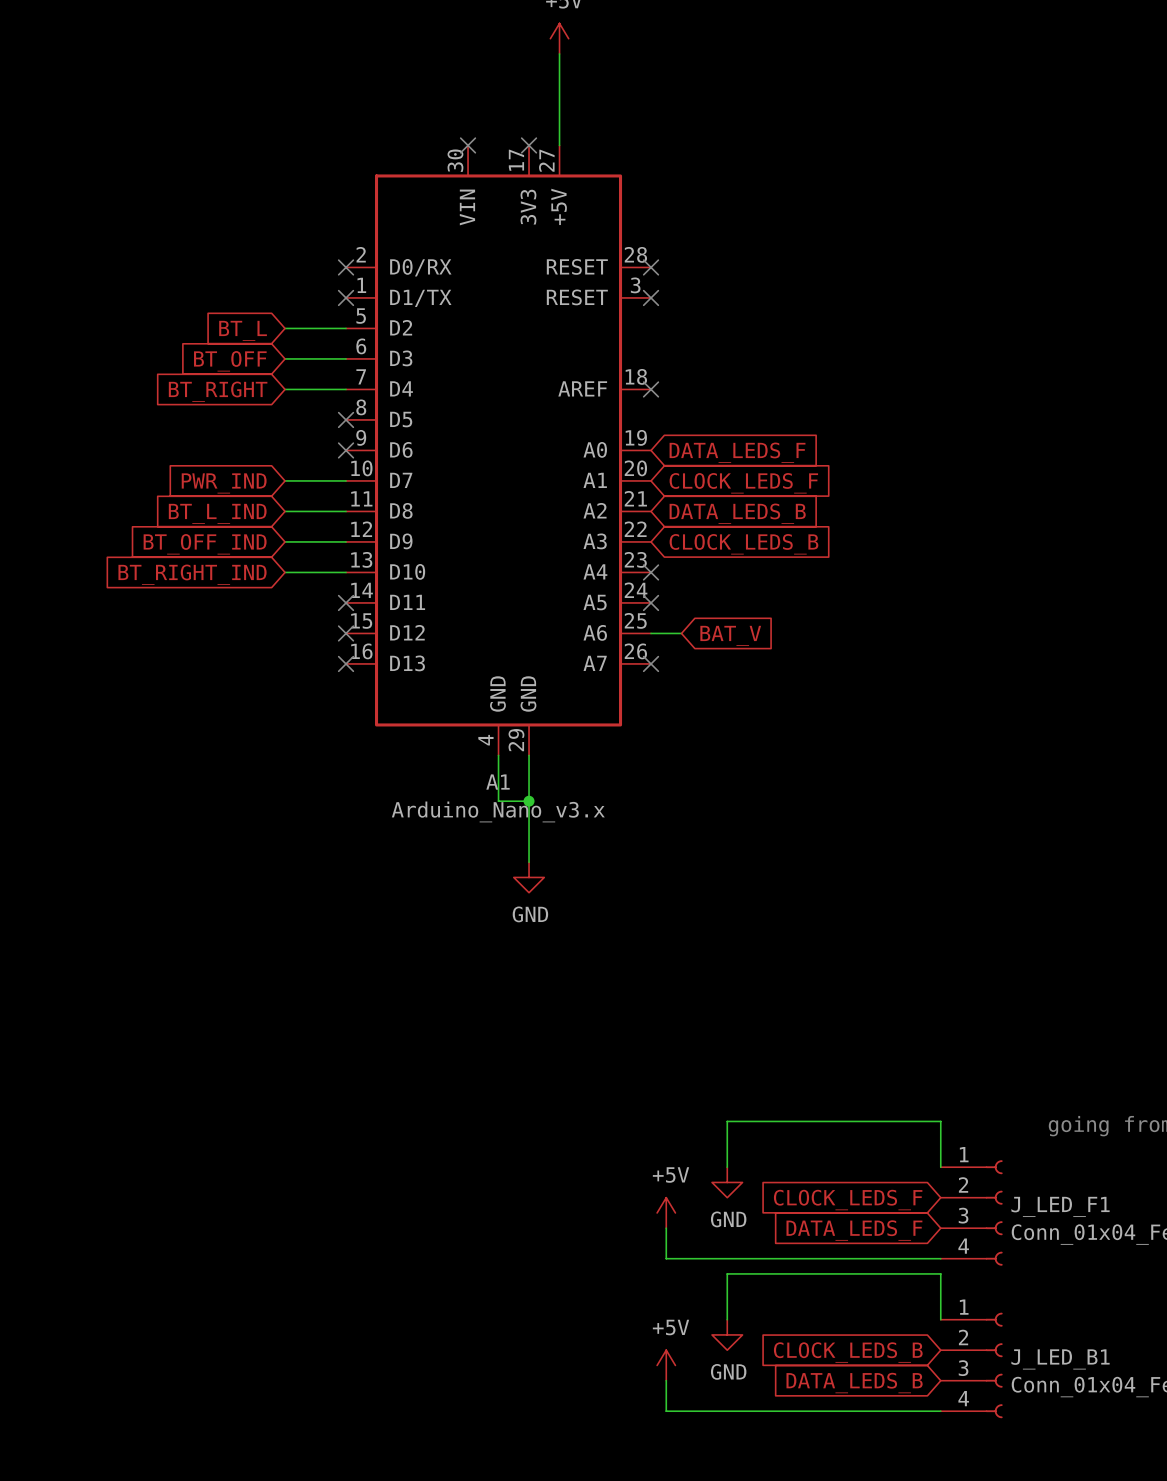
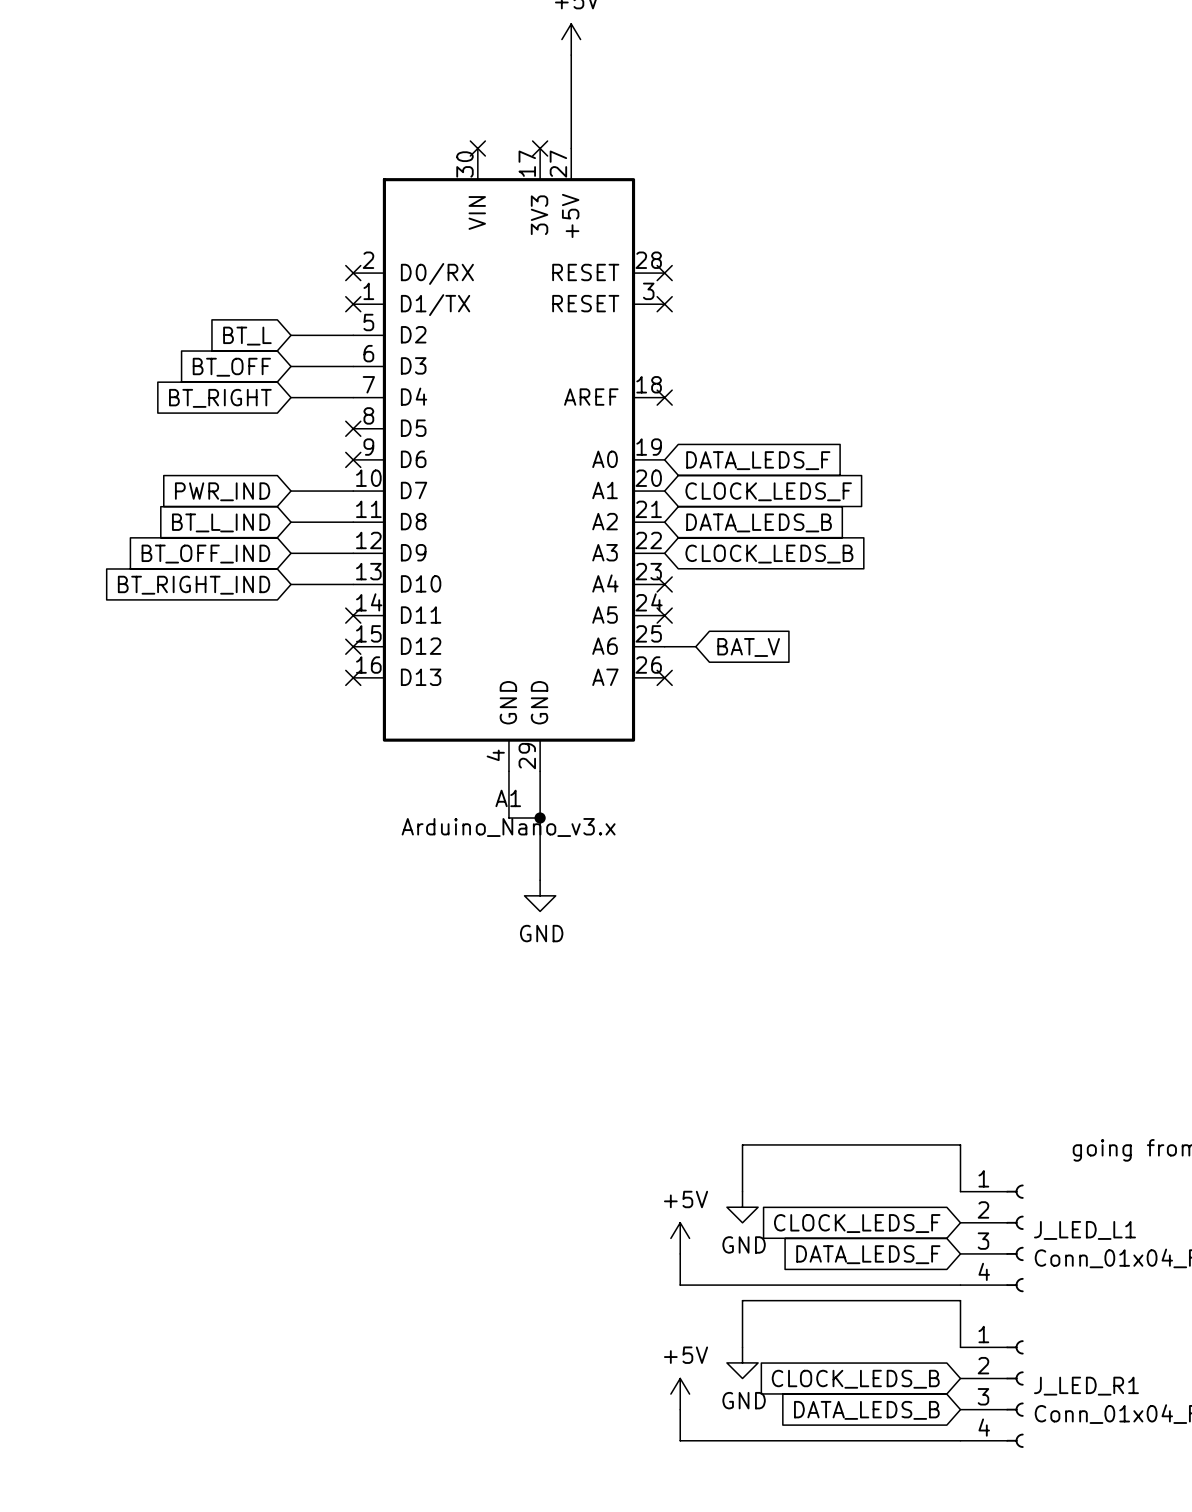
J_LED_F1 name: J_LED_F1 (1060, 1206) -> J_LED_L1 (1084, 1230)
J_LED_B1 name: J_LED_B1 (1060, 1359) -> J_LED_R1 (1086, 1386)

